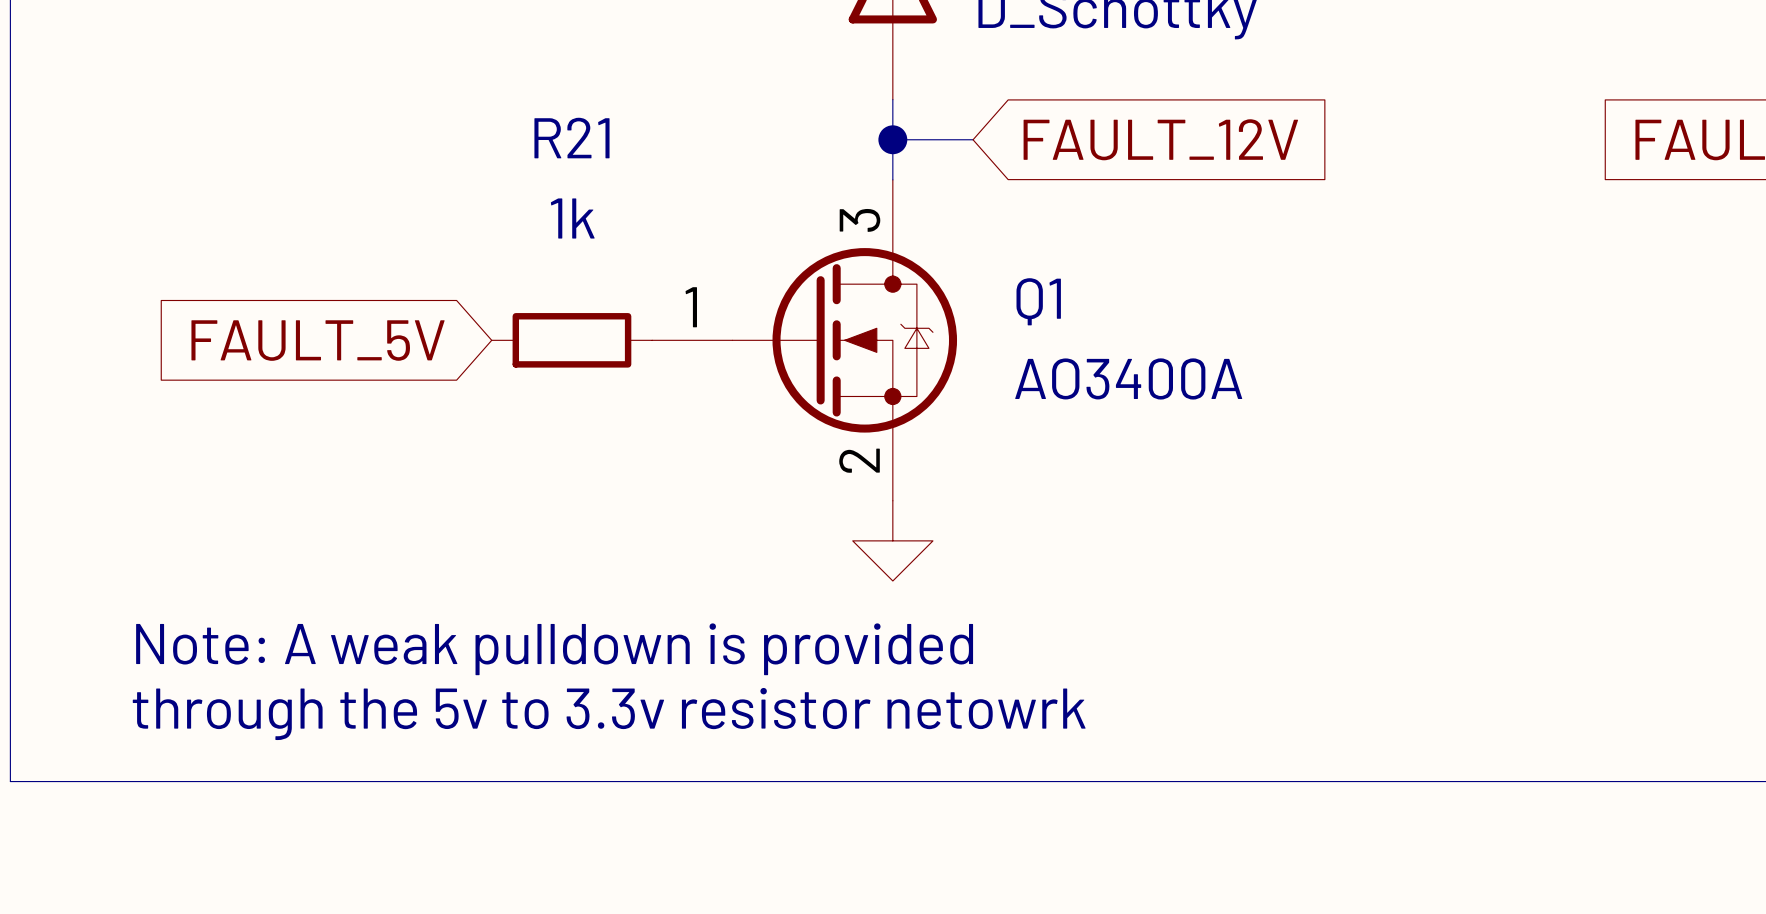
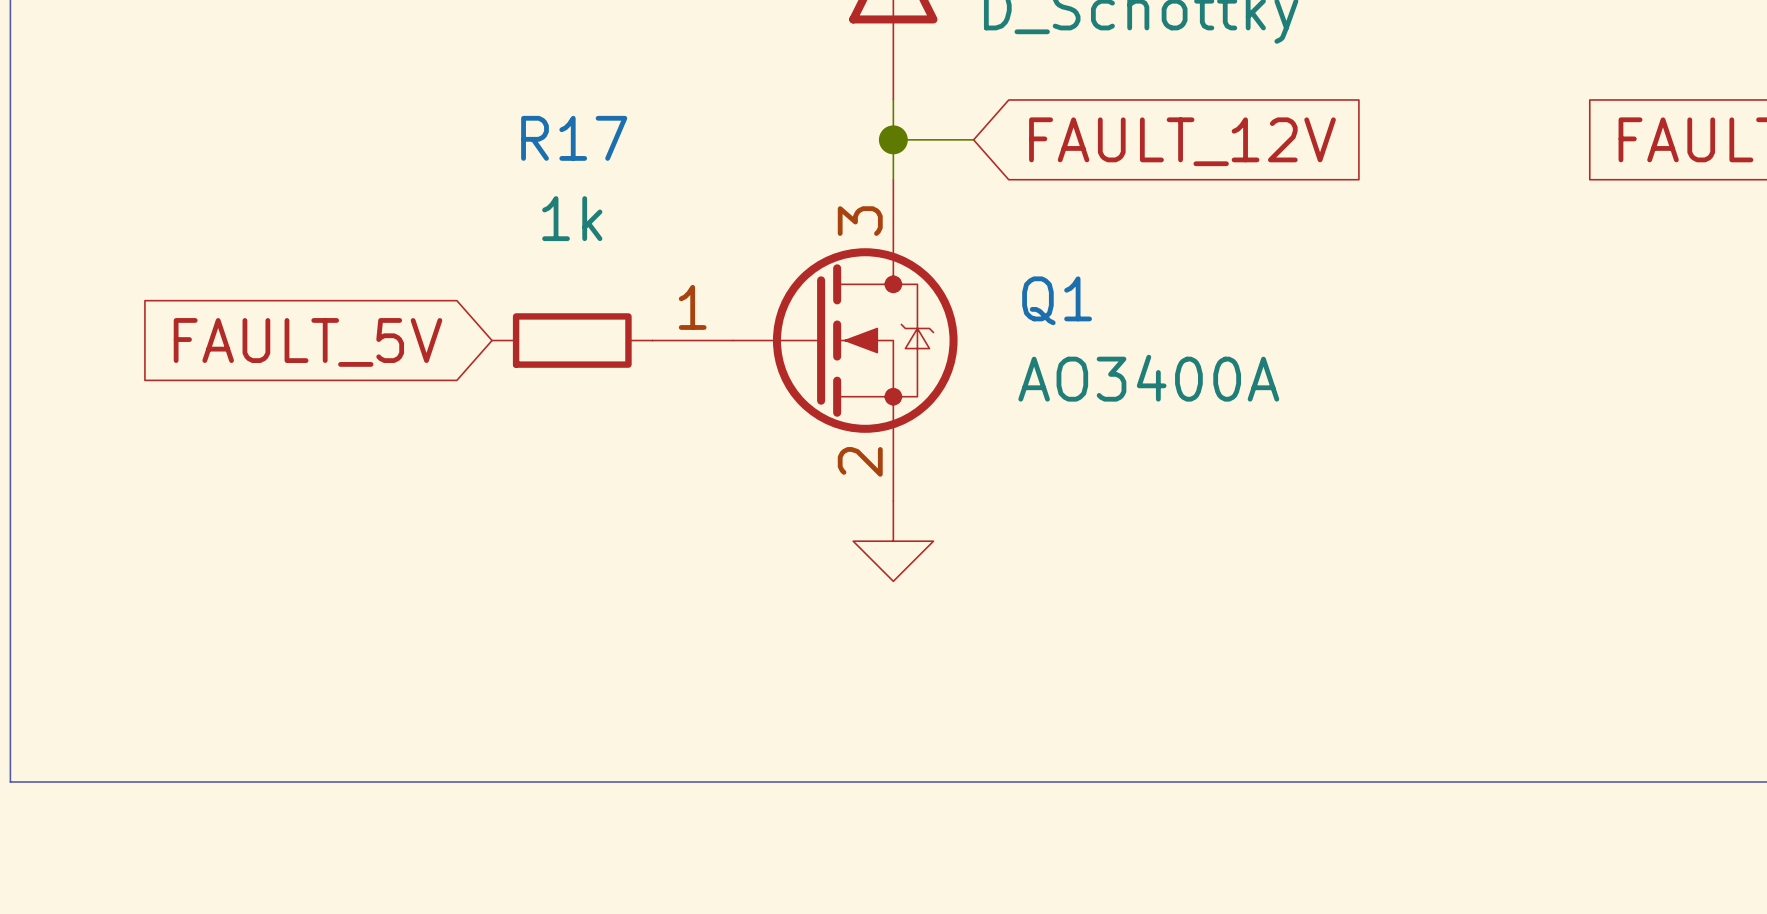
R21 name: R21 (571, 138) -> R17 (574, 138)
text: Note: A weak pulldown is provided (554, 649) -> none
text: through the 5v to 3.3v resistor netowrk (609, 713) -> none

